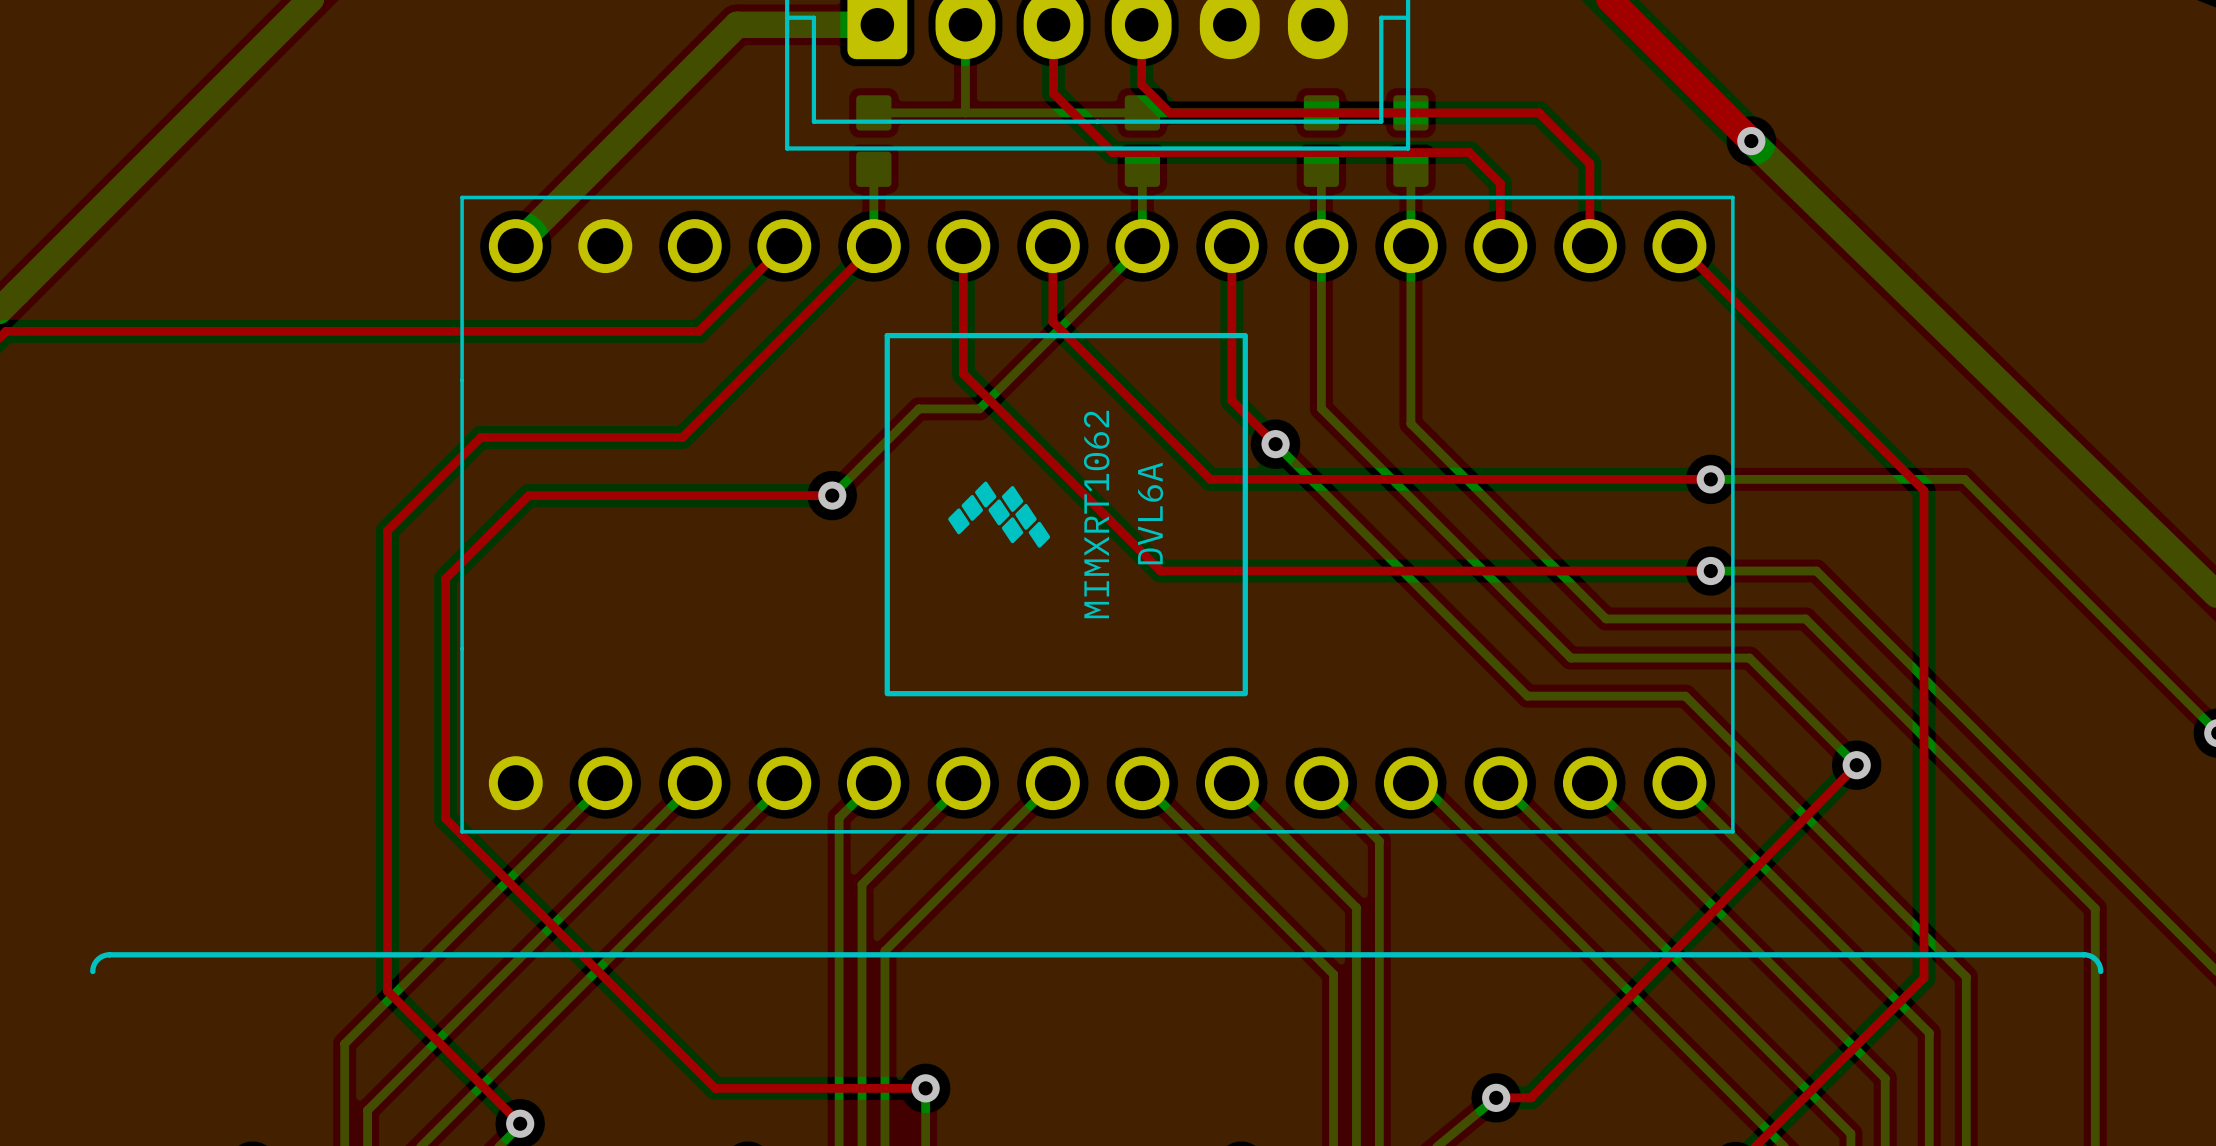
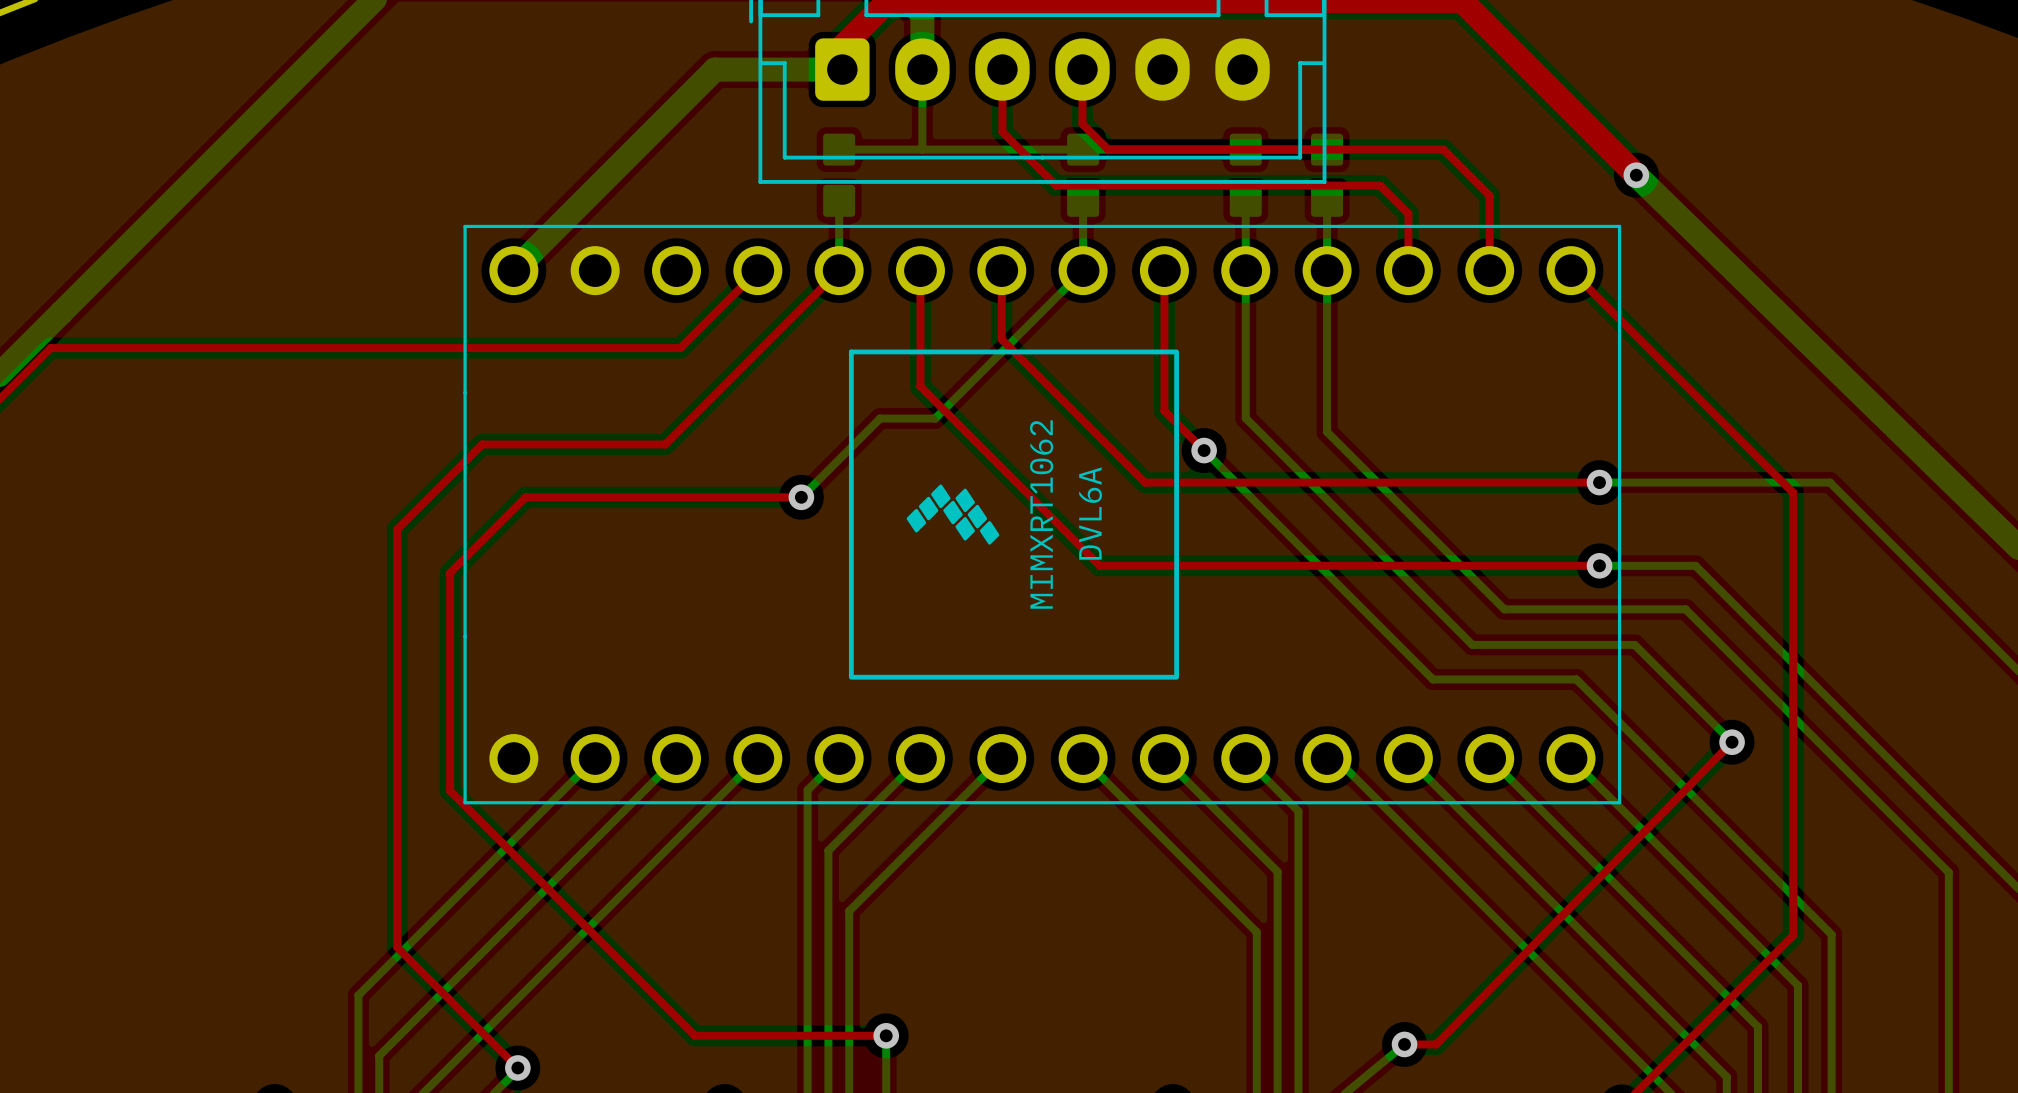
line: (92, 971) (97, 959) (109, 954) (2083, 954) (2095, 959) (2100, 971) -> none

